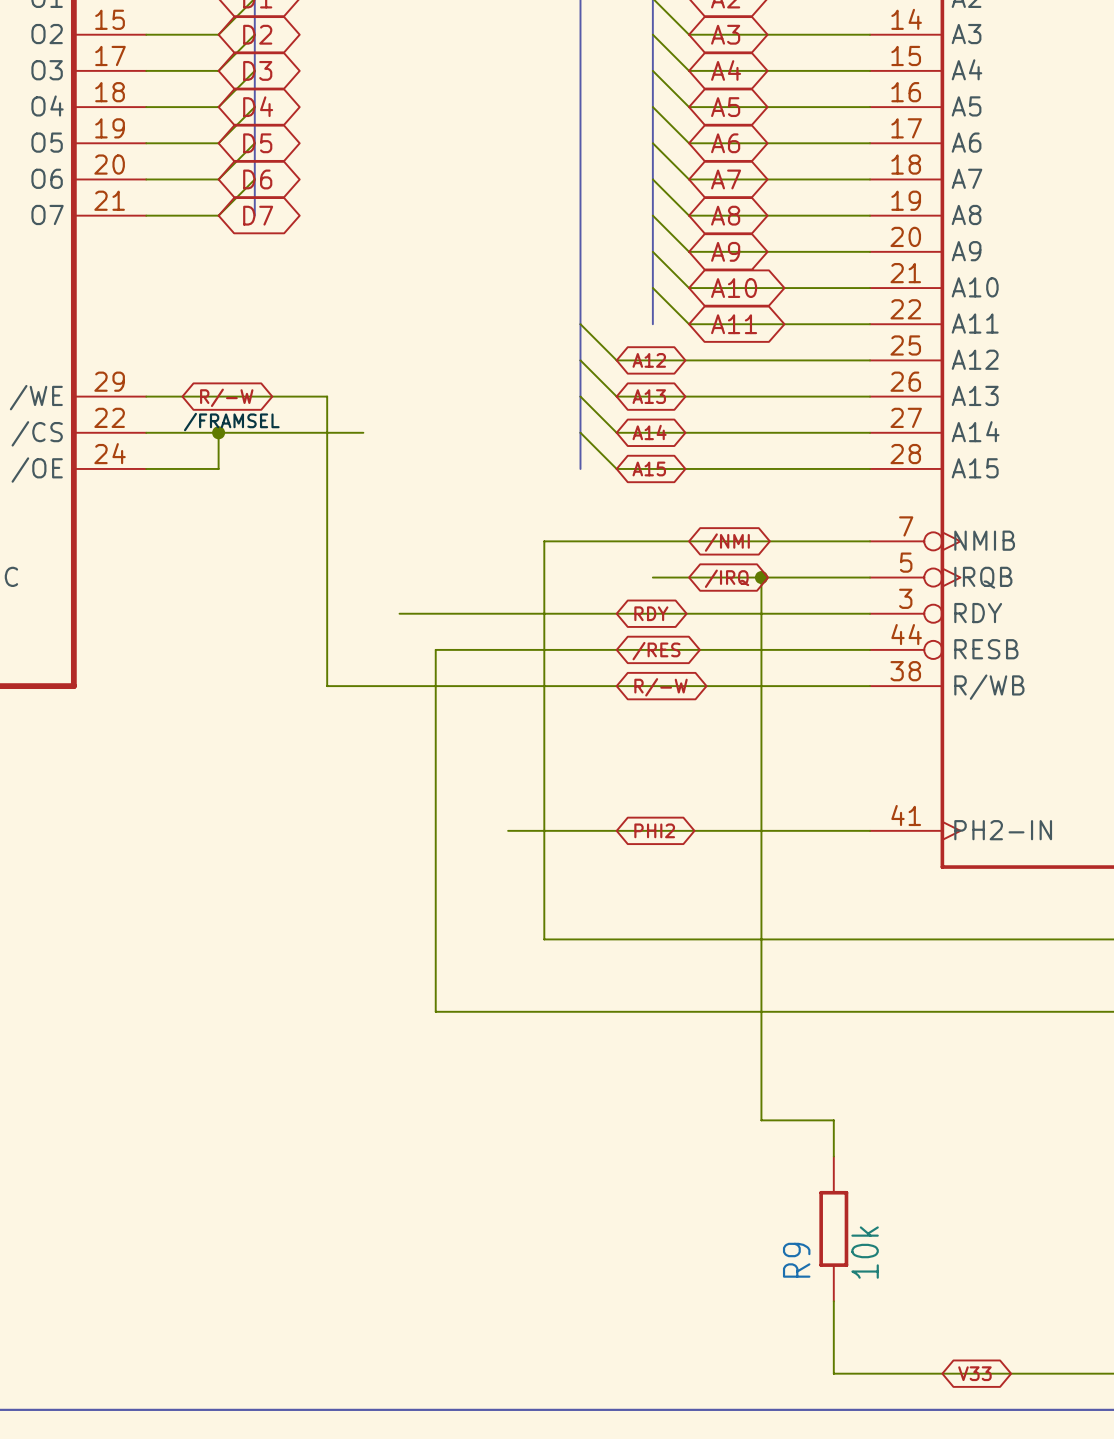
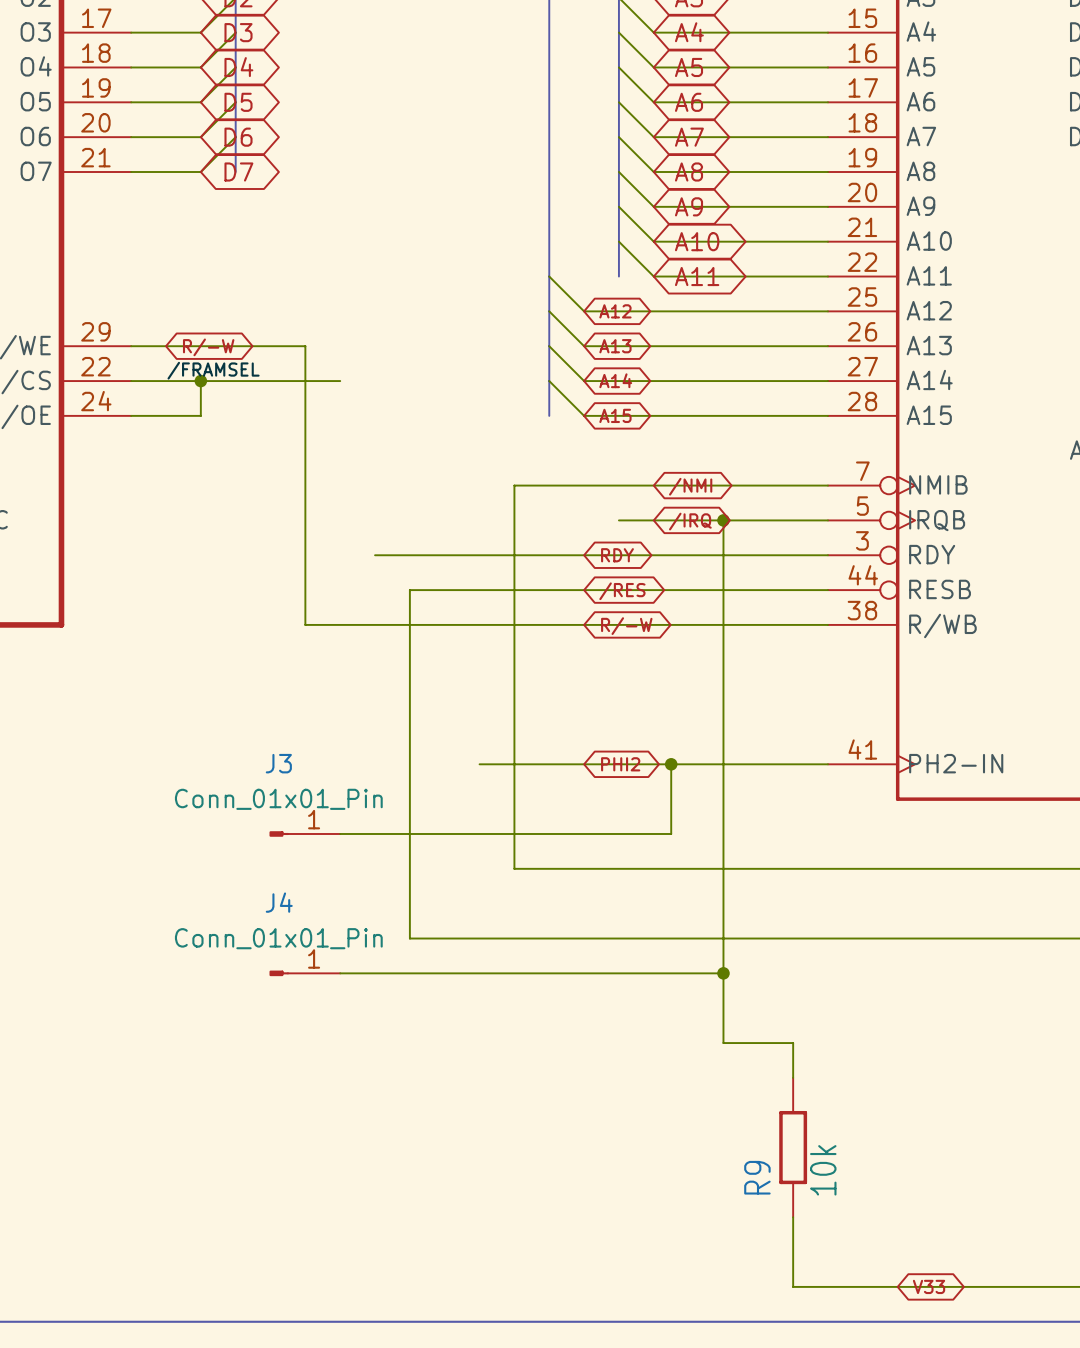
wire: none -> (671, 764) (671, 833) (340, 833)
junction: none -> (671, 764)
J3: none -> Conn_01x01_Pin (304, 833)
J4: none -> Conn_01x01_Pin (304, 973)
wire: none -> (340, 973) (723, 973)
junction: none -> (723, 973)

